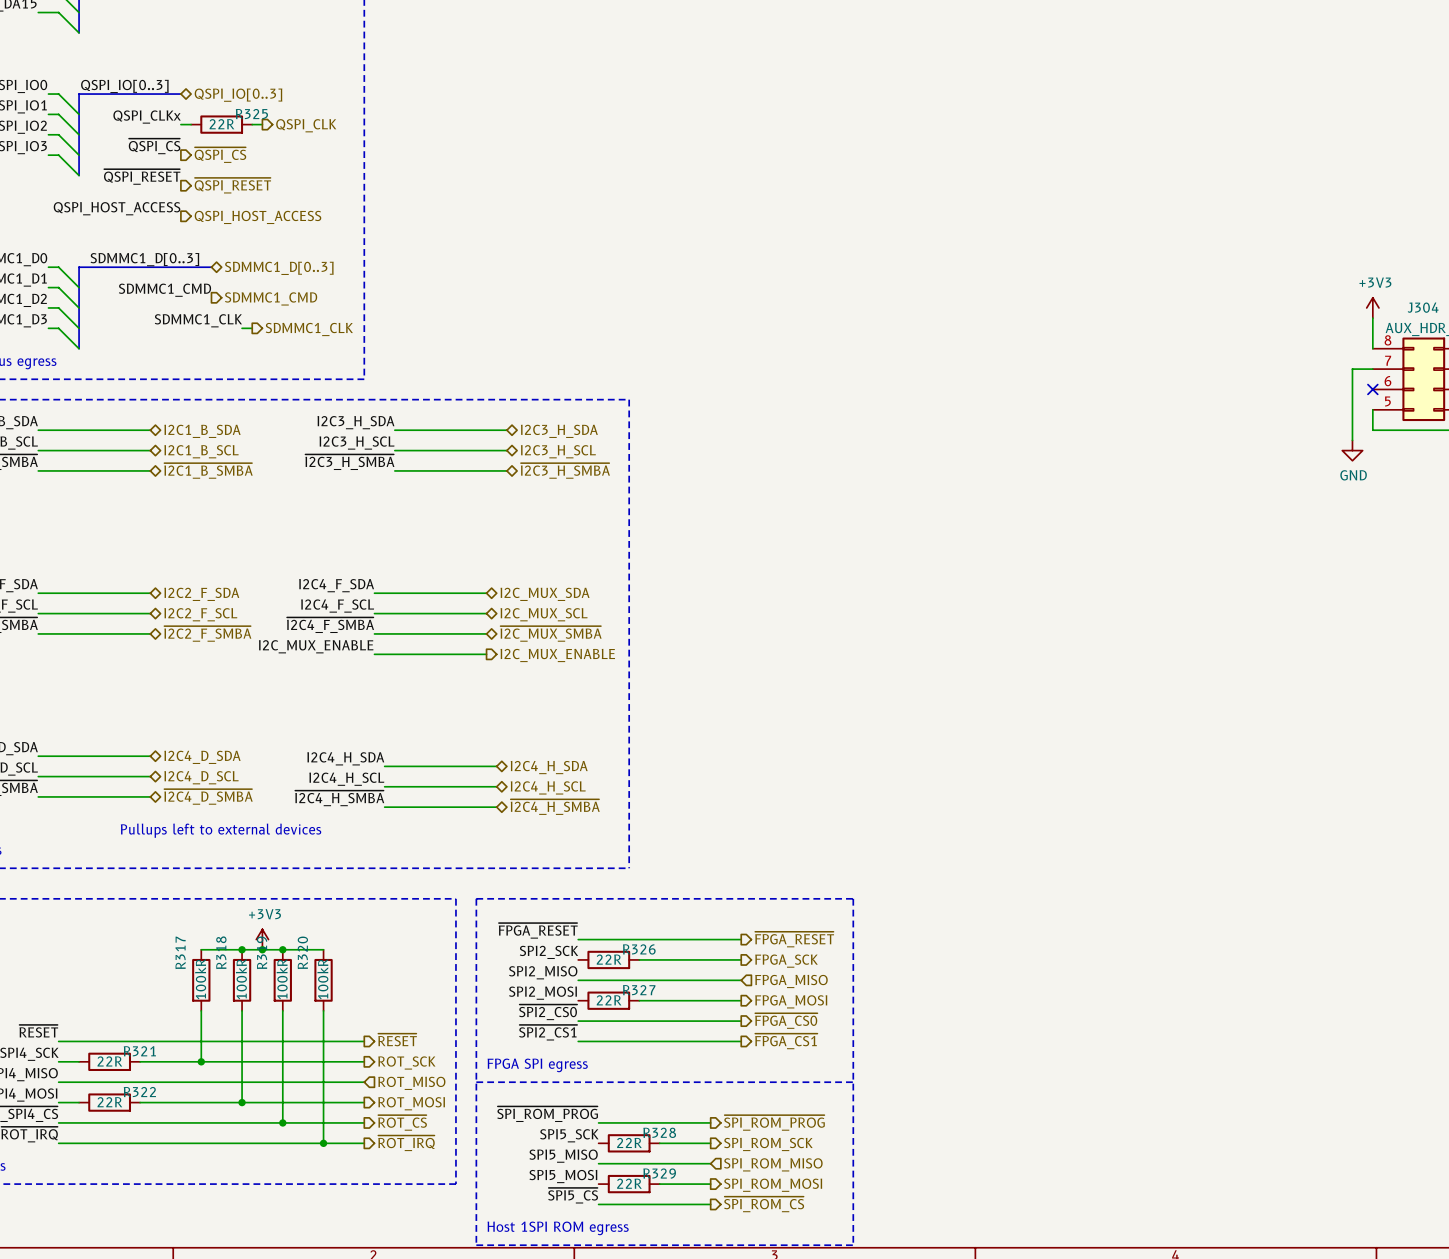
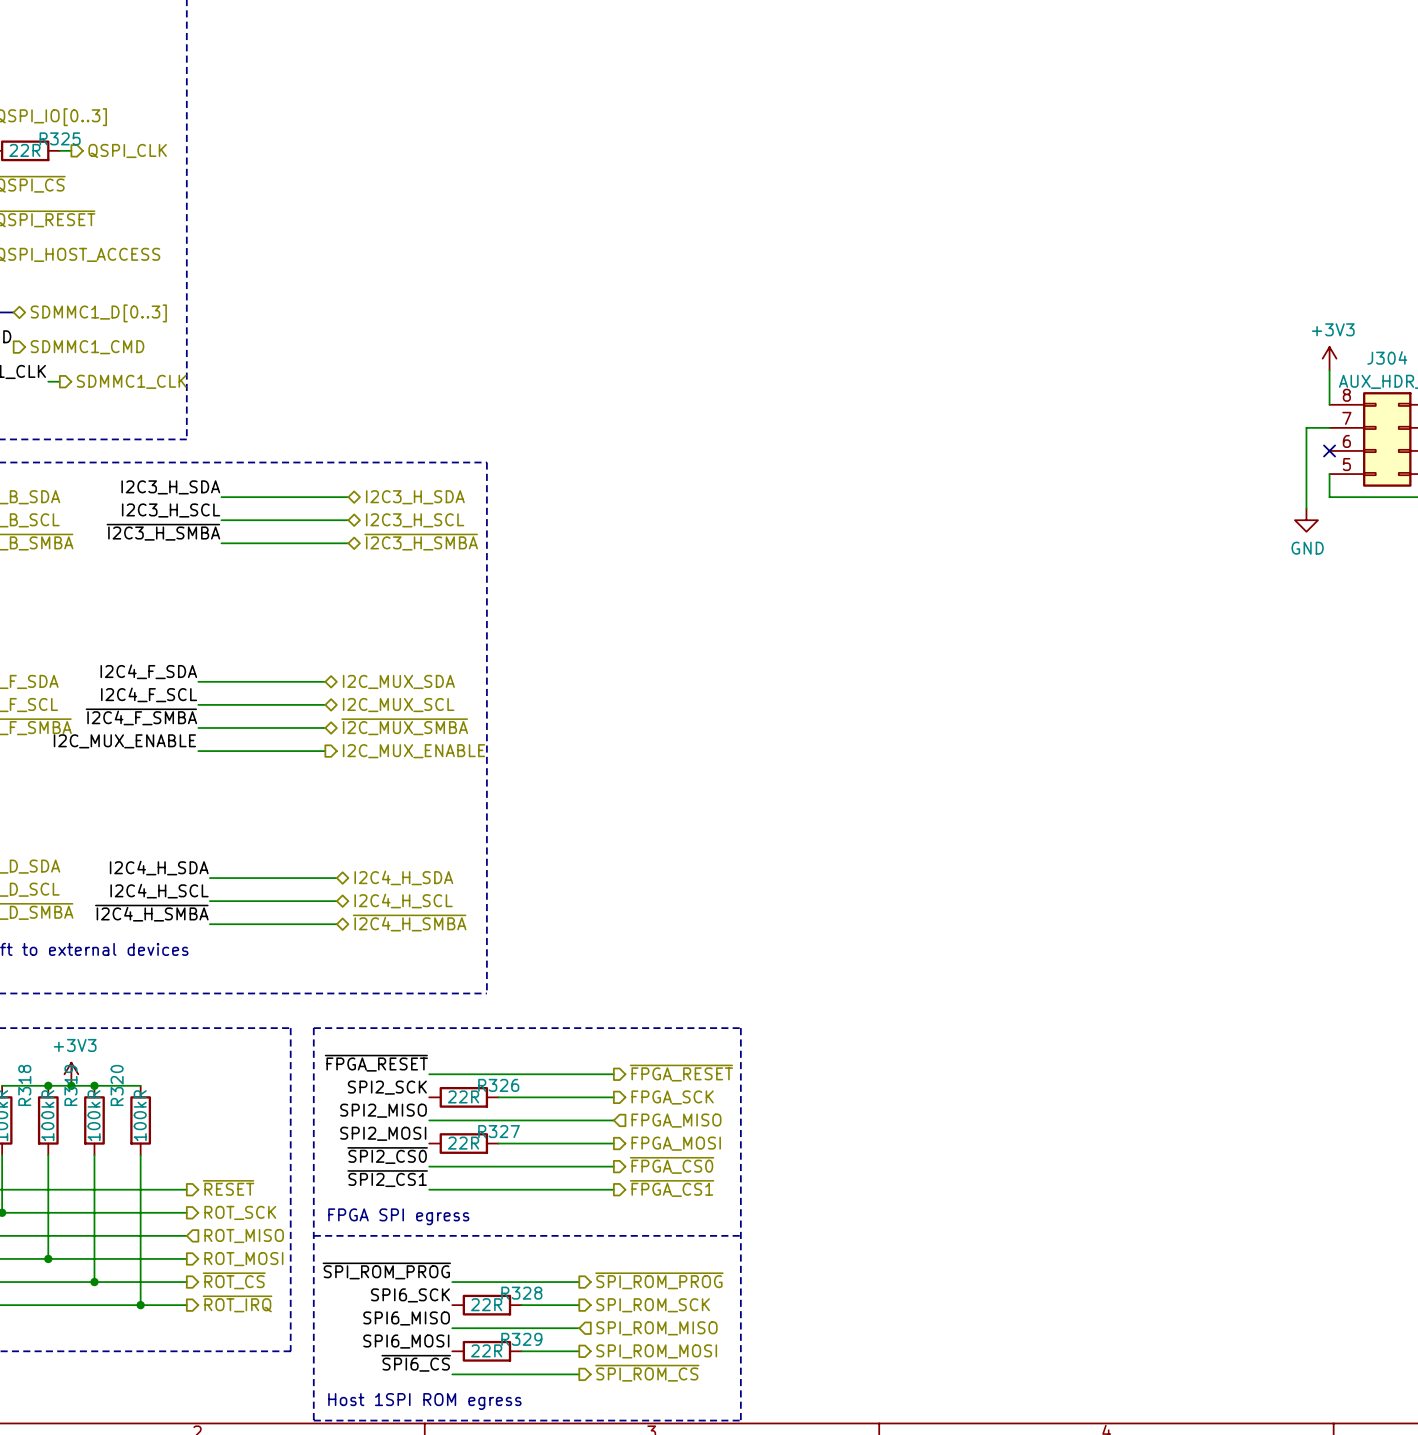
label: SPI5_SCK (569, 1135) -> SPI6_SCK (410, 1295)
label: SPI5_MISO (563, 1156) -> SPI6_MISO (406, 1318)
label: SPI5_MOSI (563, 1176) -> SPI6_MOSI (406, 1341)
label: ~{SPI5_CS} (573, 1195) -> ~{SPI6_CS} (416, 1363)

